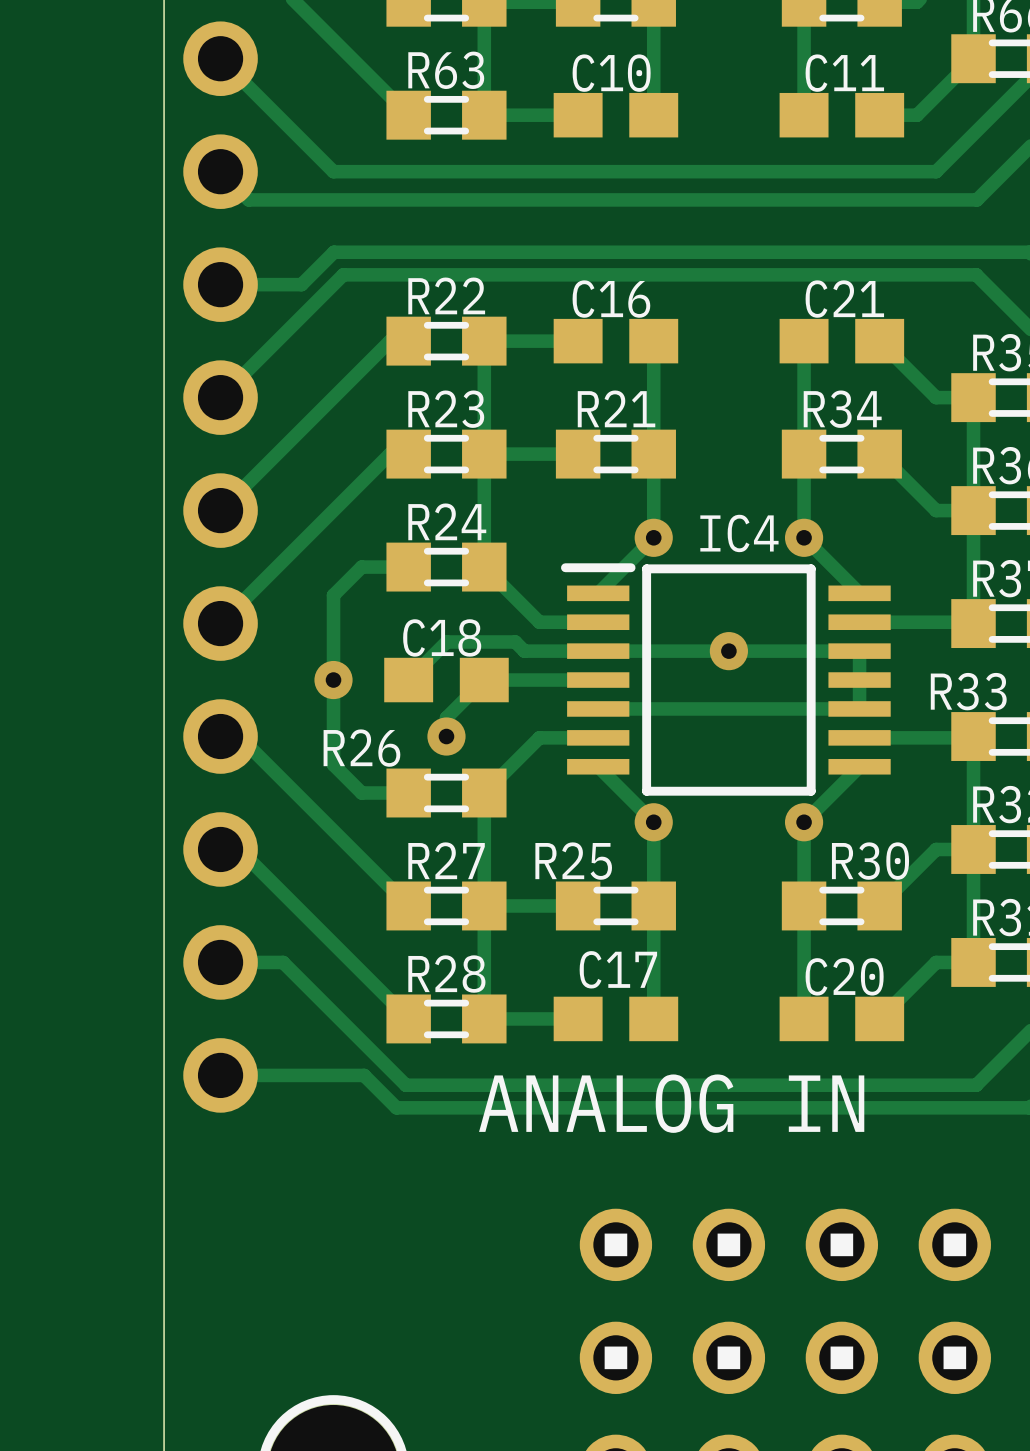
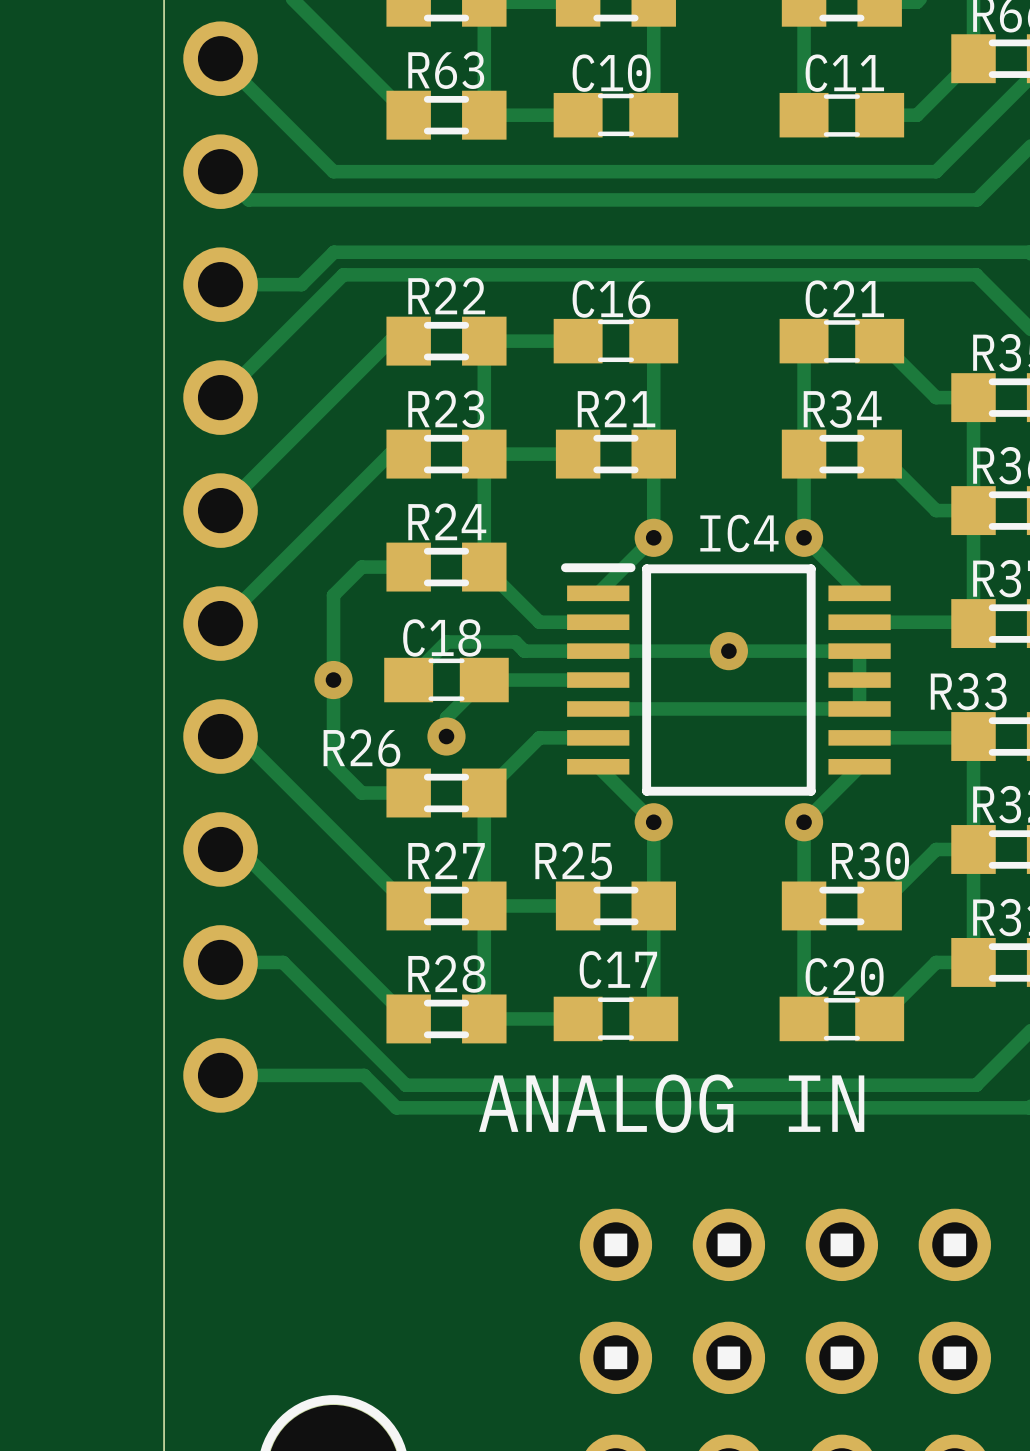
C10 footprint: [553, 92, 679, 138] -> [553, 92, 679, 138]
C11 footprint: [779, 92, 905, 138] -> [779, 92, 905, 138]
C16 footprint: [553, 318, 679, 364] -> [553, 318, 679, 364]
C21 footprint: [779, 318, 905, 364] -> [779, 318, 905, 364]
C18 footprint: [384, 657, 509, 703] -> [384, 657, 509, 703]
C17 footprint: [553, 996, 679, 1042] -> [553, 996, 679, 1042]
C20 footprint: [779, 996, 905, 1042] -> [779, 996, 905, 1042]

